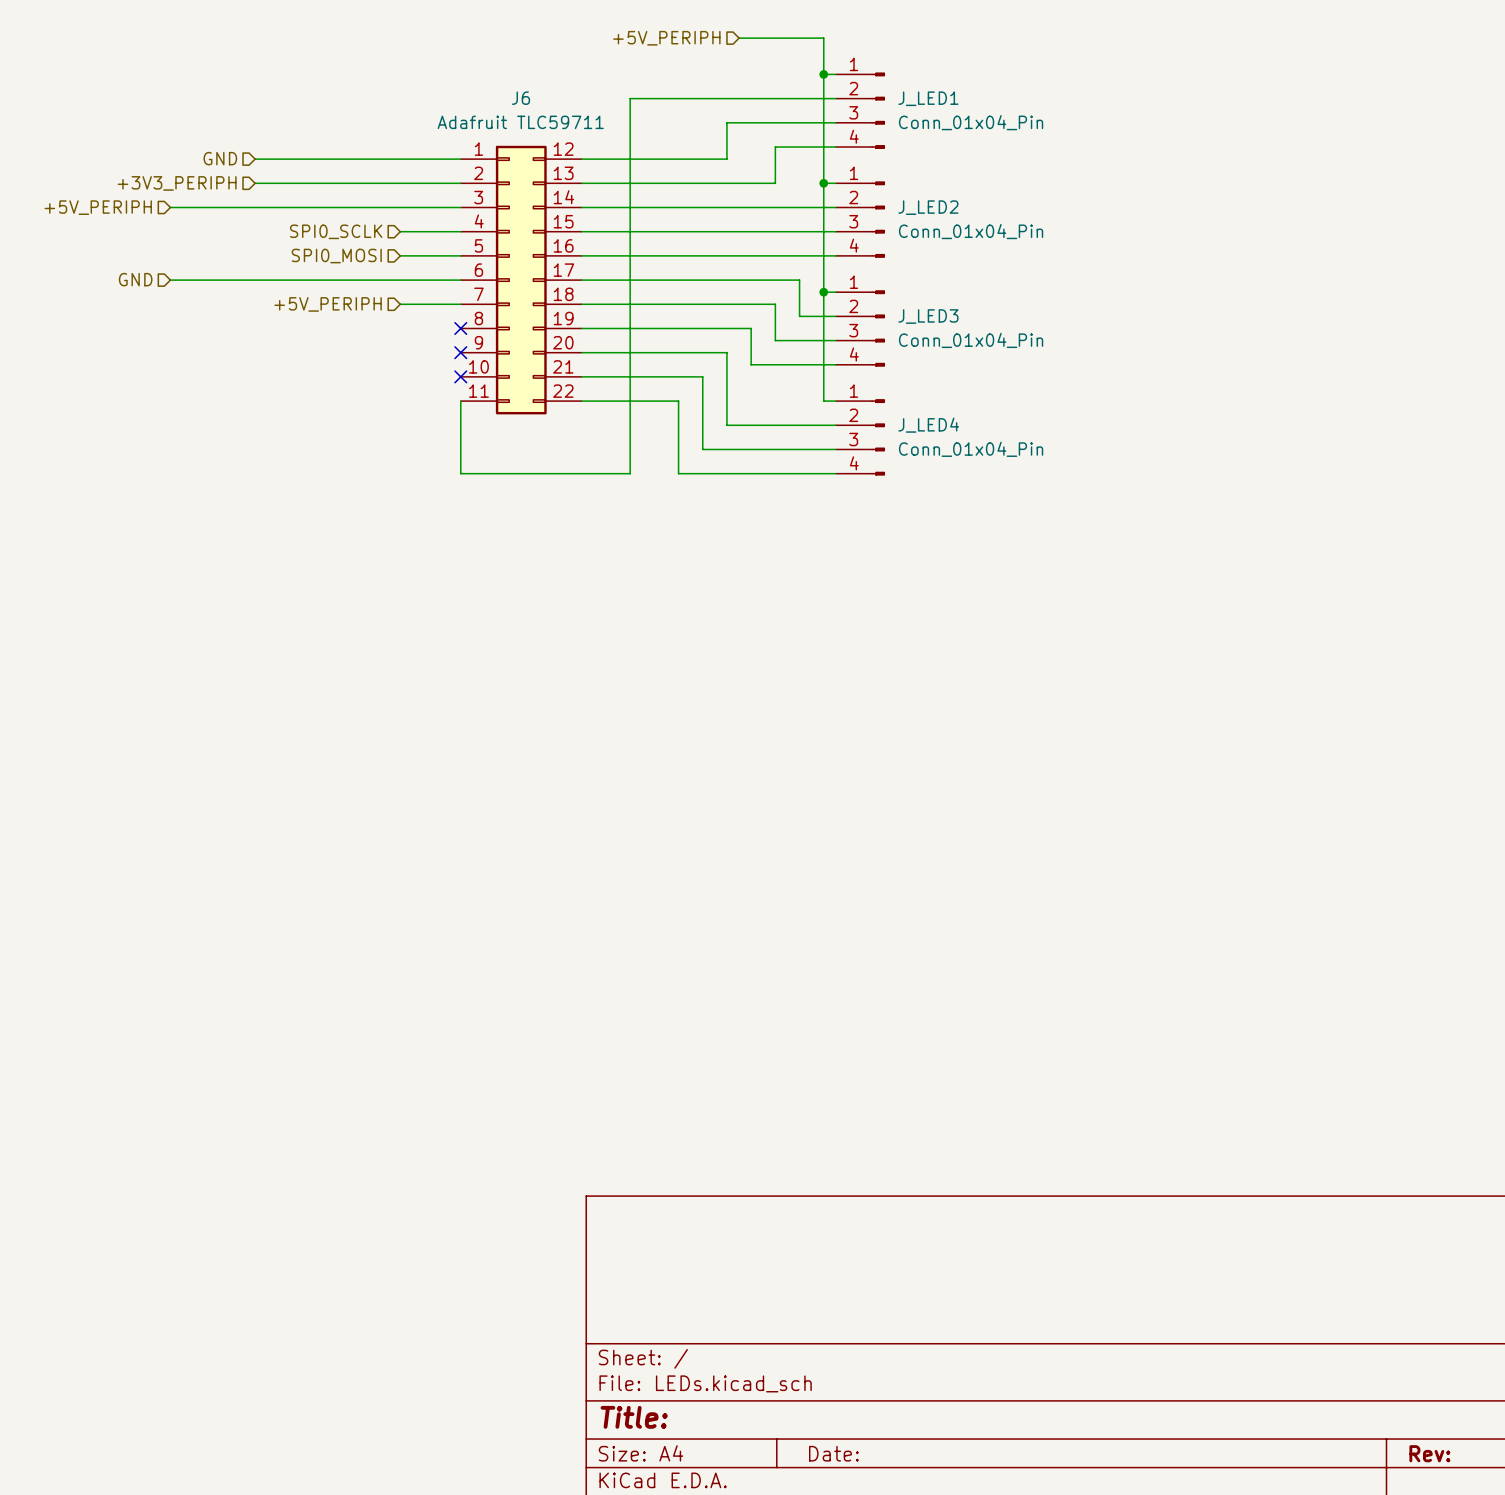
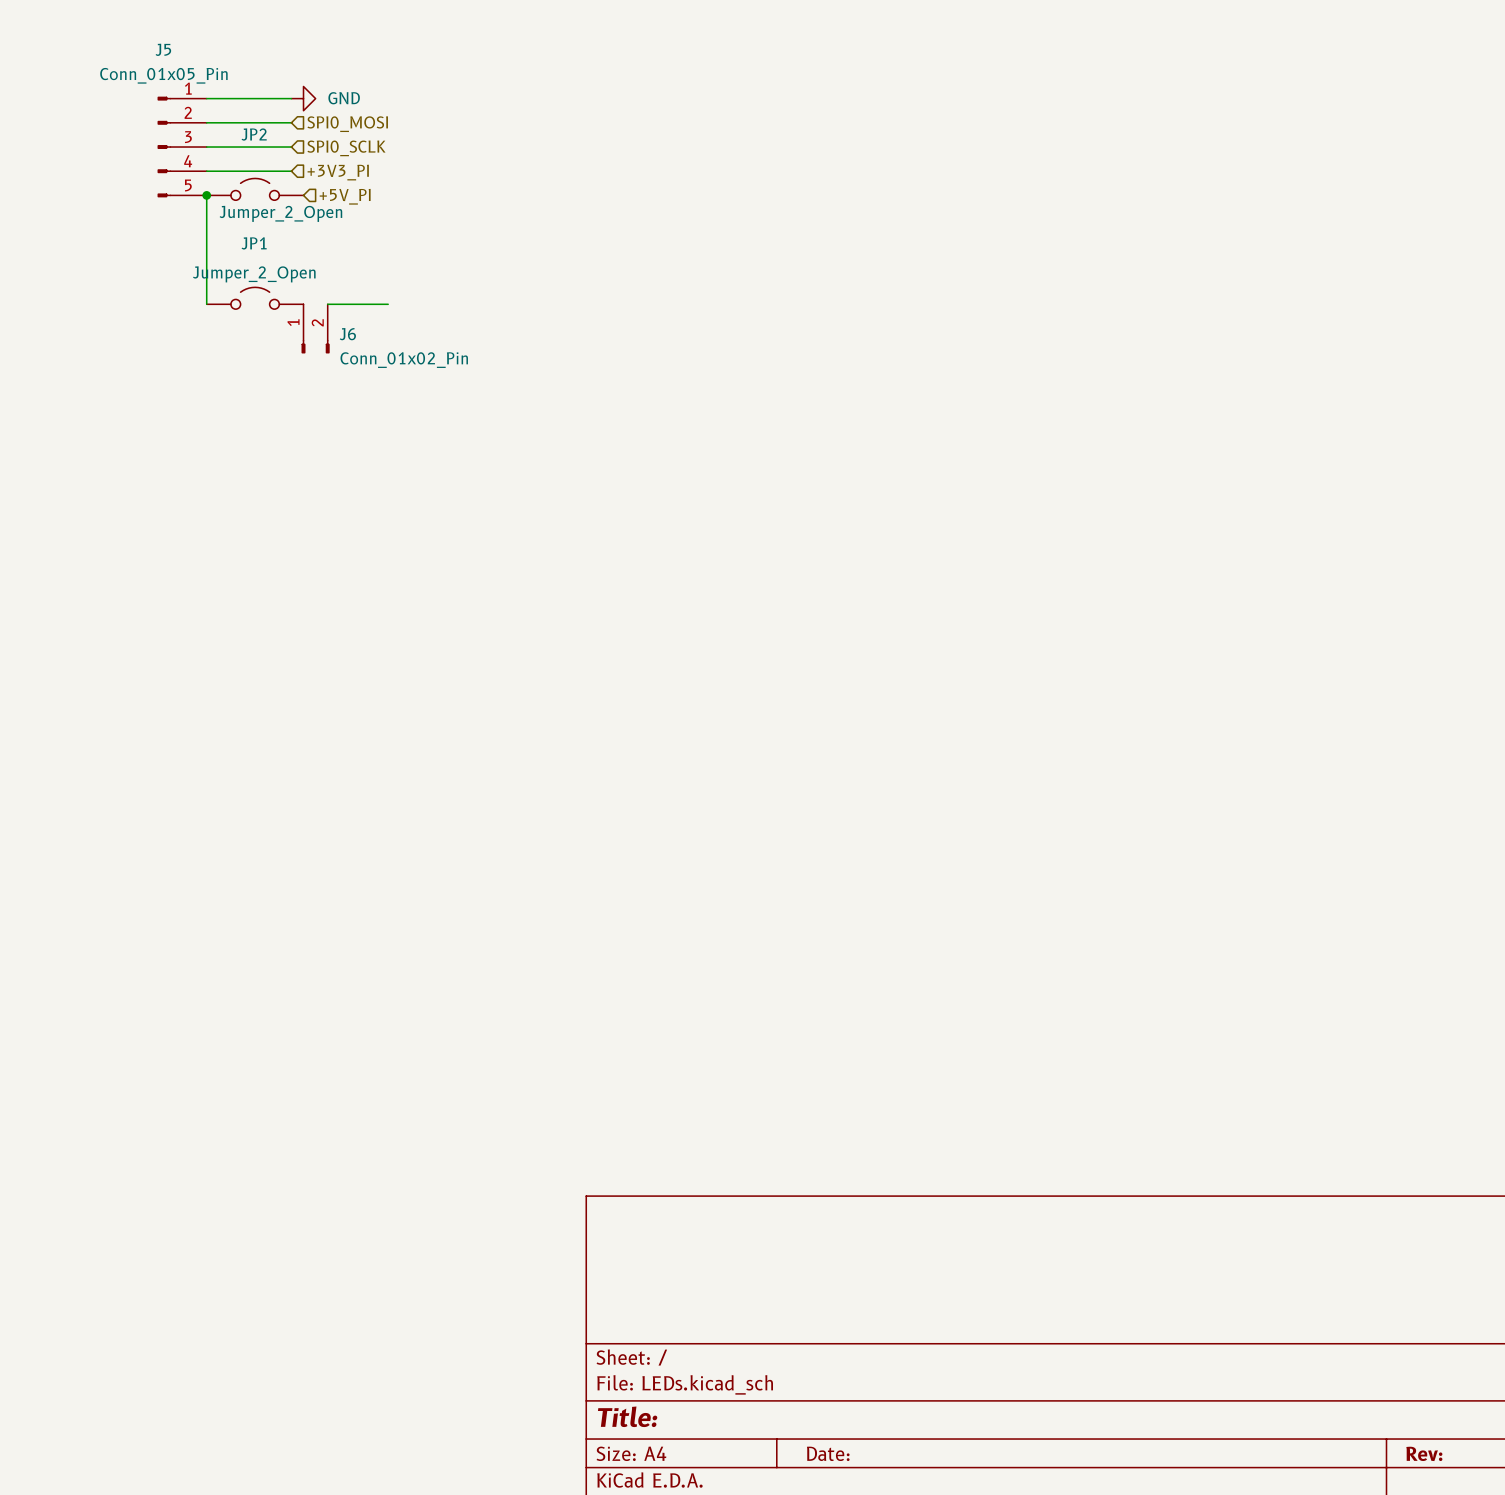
hierarchical label: +5V_PERIPH (666, 38) -> none
wire: (739, 38) (823, 38) (823, 401) (835, 401) -> none
wire: (823, 74) (835, 74) -> none
junction: (823, 74) -> none
wire: none -> (206, 98) (291, 98)
power symbol: none -> GND (303, 98)
J6 name position: J6 (521, 98) -> J6 (347, 334)
wire: (835, 98) (630, 98) (630, 473) (460, 473) (460, 401) -> none
J_LED1: Conn_01x04_Pin (860, 110) -> none
wire: none -> (206, 122) (291, 122)
J6 value: Adafruit TLC59711 (520, 122) -> Conn_01x02_Pin (404, 360)
wire: (835, 122) (726, 122) (726, 159) (581, 159) -> none
J6 symbol: [460, 145, 582, 415] -> [301, 304, 330, 354]
J5: none -> Conn_01x05_Pin (182, 147)
wire: none -> (206, 147) (291, 147)
wire: (835, 147) (775, 147) (775, 183) (581, 183) -> none
hierarchical label: GND (220, 158) -> none
wire: (255, 159) (460, 159) -> none
wire: none -> (206, 171) (291, 171)
hierarchical label: none -> +3V3_PI (338, 172)
hierarchical label: +3V3_PERIPH (177, 183) -> none
wire: (255, 183) (460, 183) -> none
wire: (823, 183) (835, 183) -> none
junction: (823, 183) -> none
JP2: none -> Jumper_2_Open (255, 189)
wire: none -> (206, 195) (206, 304)
junction: none -> (206, 195)
hierarchical label: none -> +5V_PI (345, 196)
hierarchical label: +5V_PERIPH (98, 207) -> none
wire: (170, 207) (460, 207) -> none
wire: (581, 207) (835, 207) -> none
J_LED2: Conn_01x04_Pin (860, 219) -> none
hierarchical label rotation: 0° (336, 231) -> 180° (346, 148)
wire: (400, 231) (460, 231) -> none
wire: (581, 231) (835, 231) -> none
wire: (400, 255) (460, 255) -> none
wire: (581, 255) (835, 255) -> none
hierarchical label rotation: 0° (336, 256) -> 180° (347, 124)
hierarchical label position: SPI0_MOSI (336, 256) -> SPI0_MOSI (347, 124)
hierarchical label: GND (135, 279) -> none
wire: (170, 280) (460, 280) -> none
wire: (581, 280) (799, 280) (799, 316) (835, 316) -> none
wire: (823, 292) (835, 292) -> none
junction: (823, 292) -> none
JP1: none -> Jumper_2_Open (255, 298)
hierarchical label: +5V_PERIPH (328, 304) -> none
wire: (400, 304) (460, 304) -> (327, 304) (388, 304)
wire: (581, 304) (775, 304) (775, 340) (835, 340) -> none
no-connect mark: (460, 328) -> none
wire: (581, 328) (751, 328) (751, 364) (835, 364) -> none
J_LED3: Conn_01x04_Pin (860, 328) -> none
no-connect mark: (460, 352) -> none
wire: (581, 352) (726, 352) (726, 425) (835, 425) -> none
no-connect mark: (460, 376) -> none
wire: (581, 376) (702, 376) (702, 449) (835, 449) -> none
wire: (581, 401) (678, 401) (678, 473) (835, 473) -> none
J_LED4: Conn_01x04_Pin (860, 437) -> none

